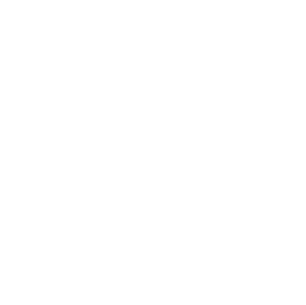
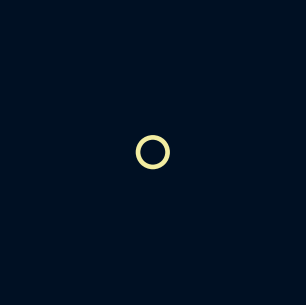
part: none -> (152, 152)

